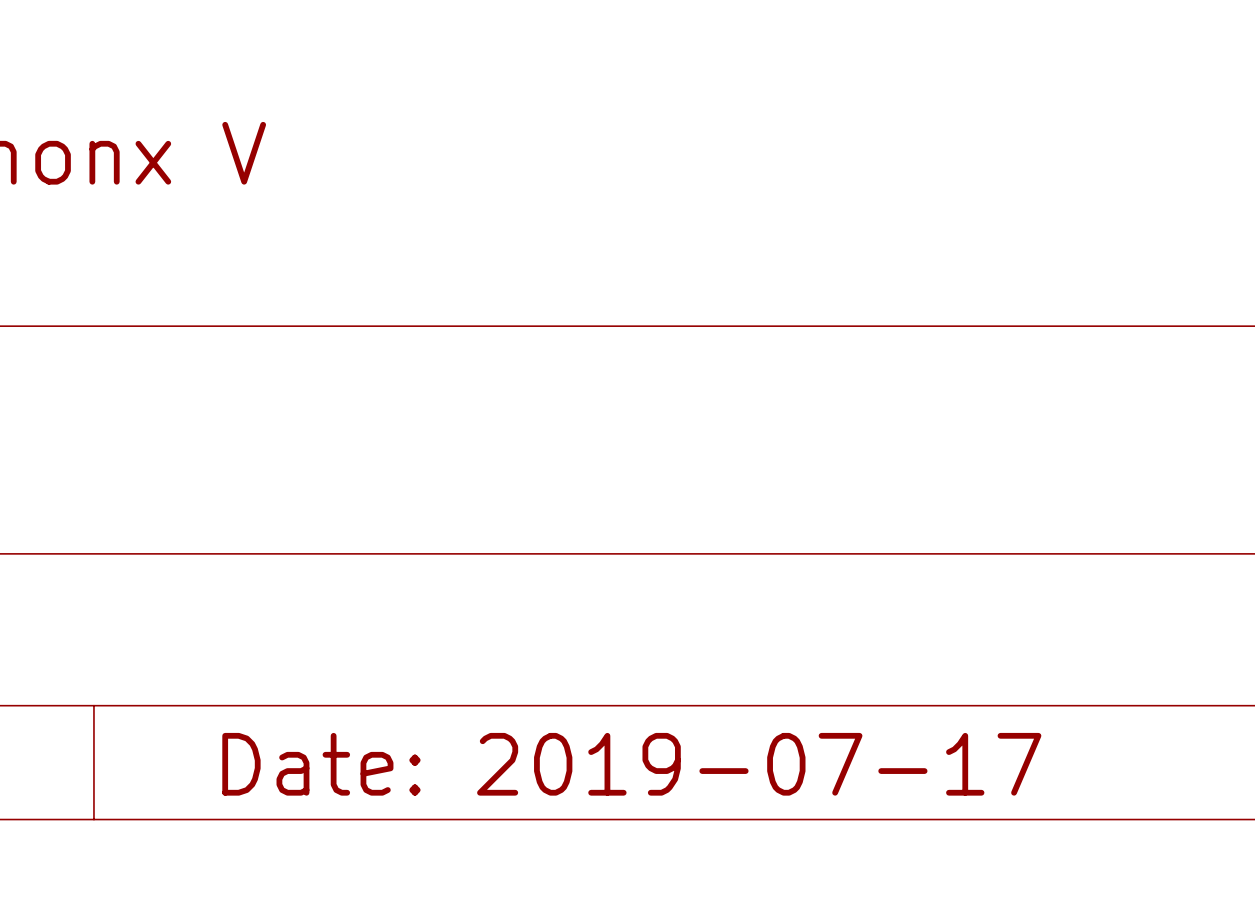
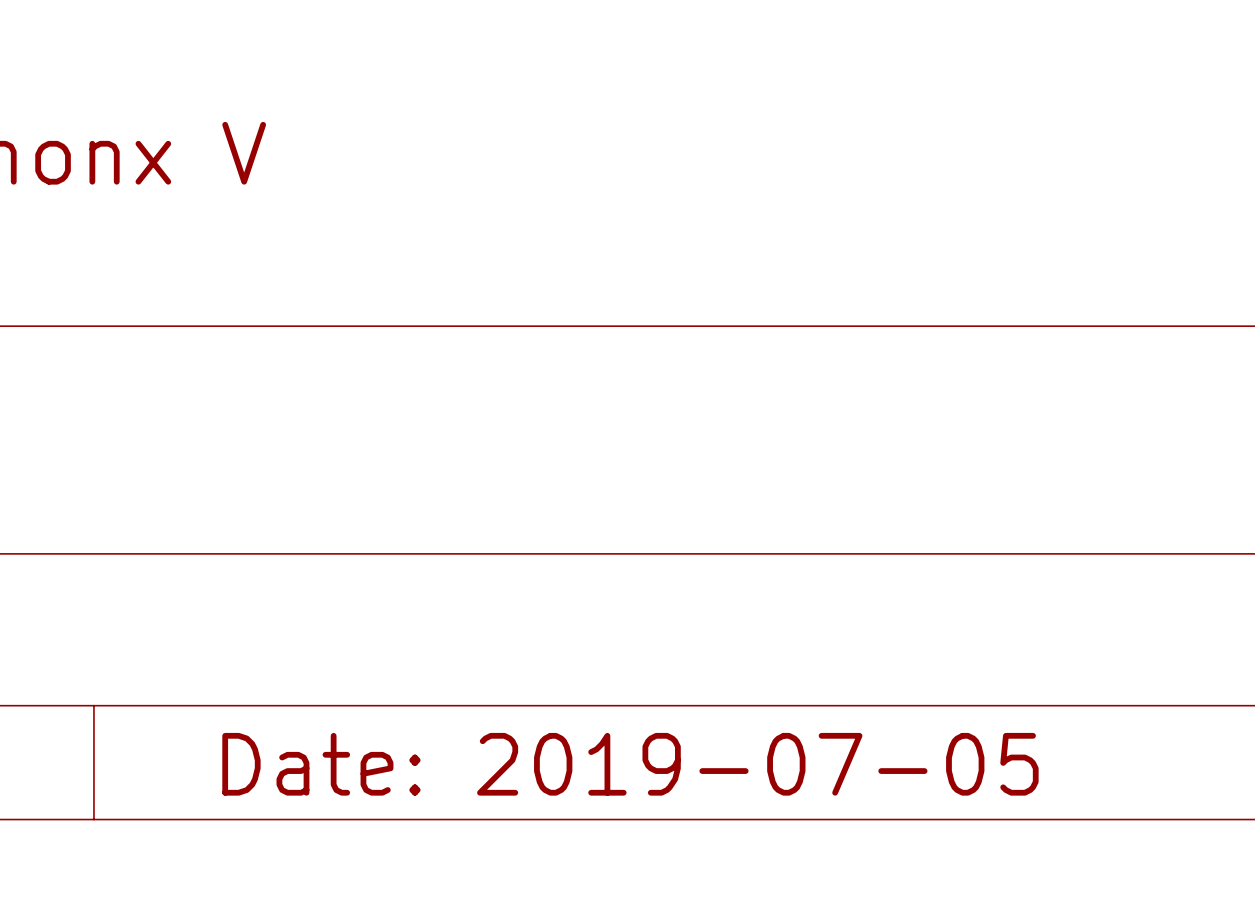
title block: Date: 2019-07-17 (631, 764) -> Date: 2019-07-05 (630, 764)

